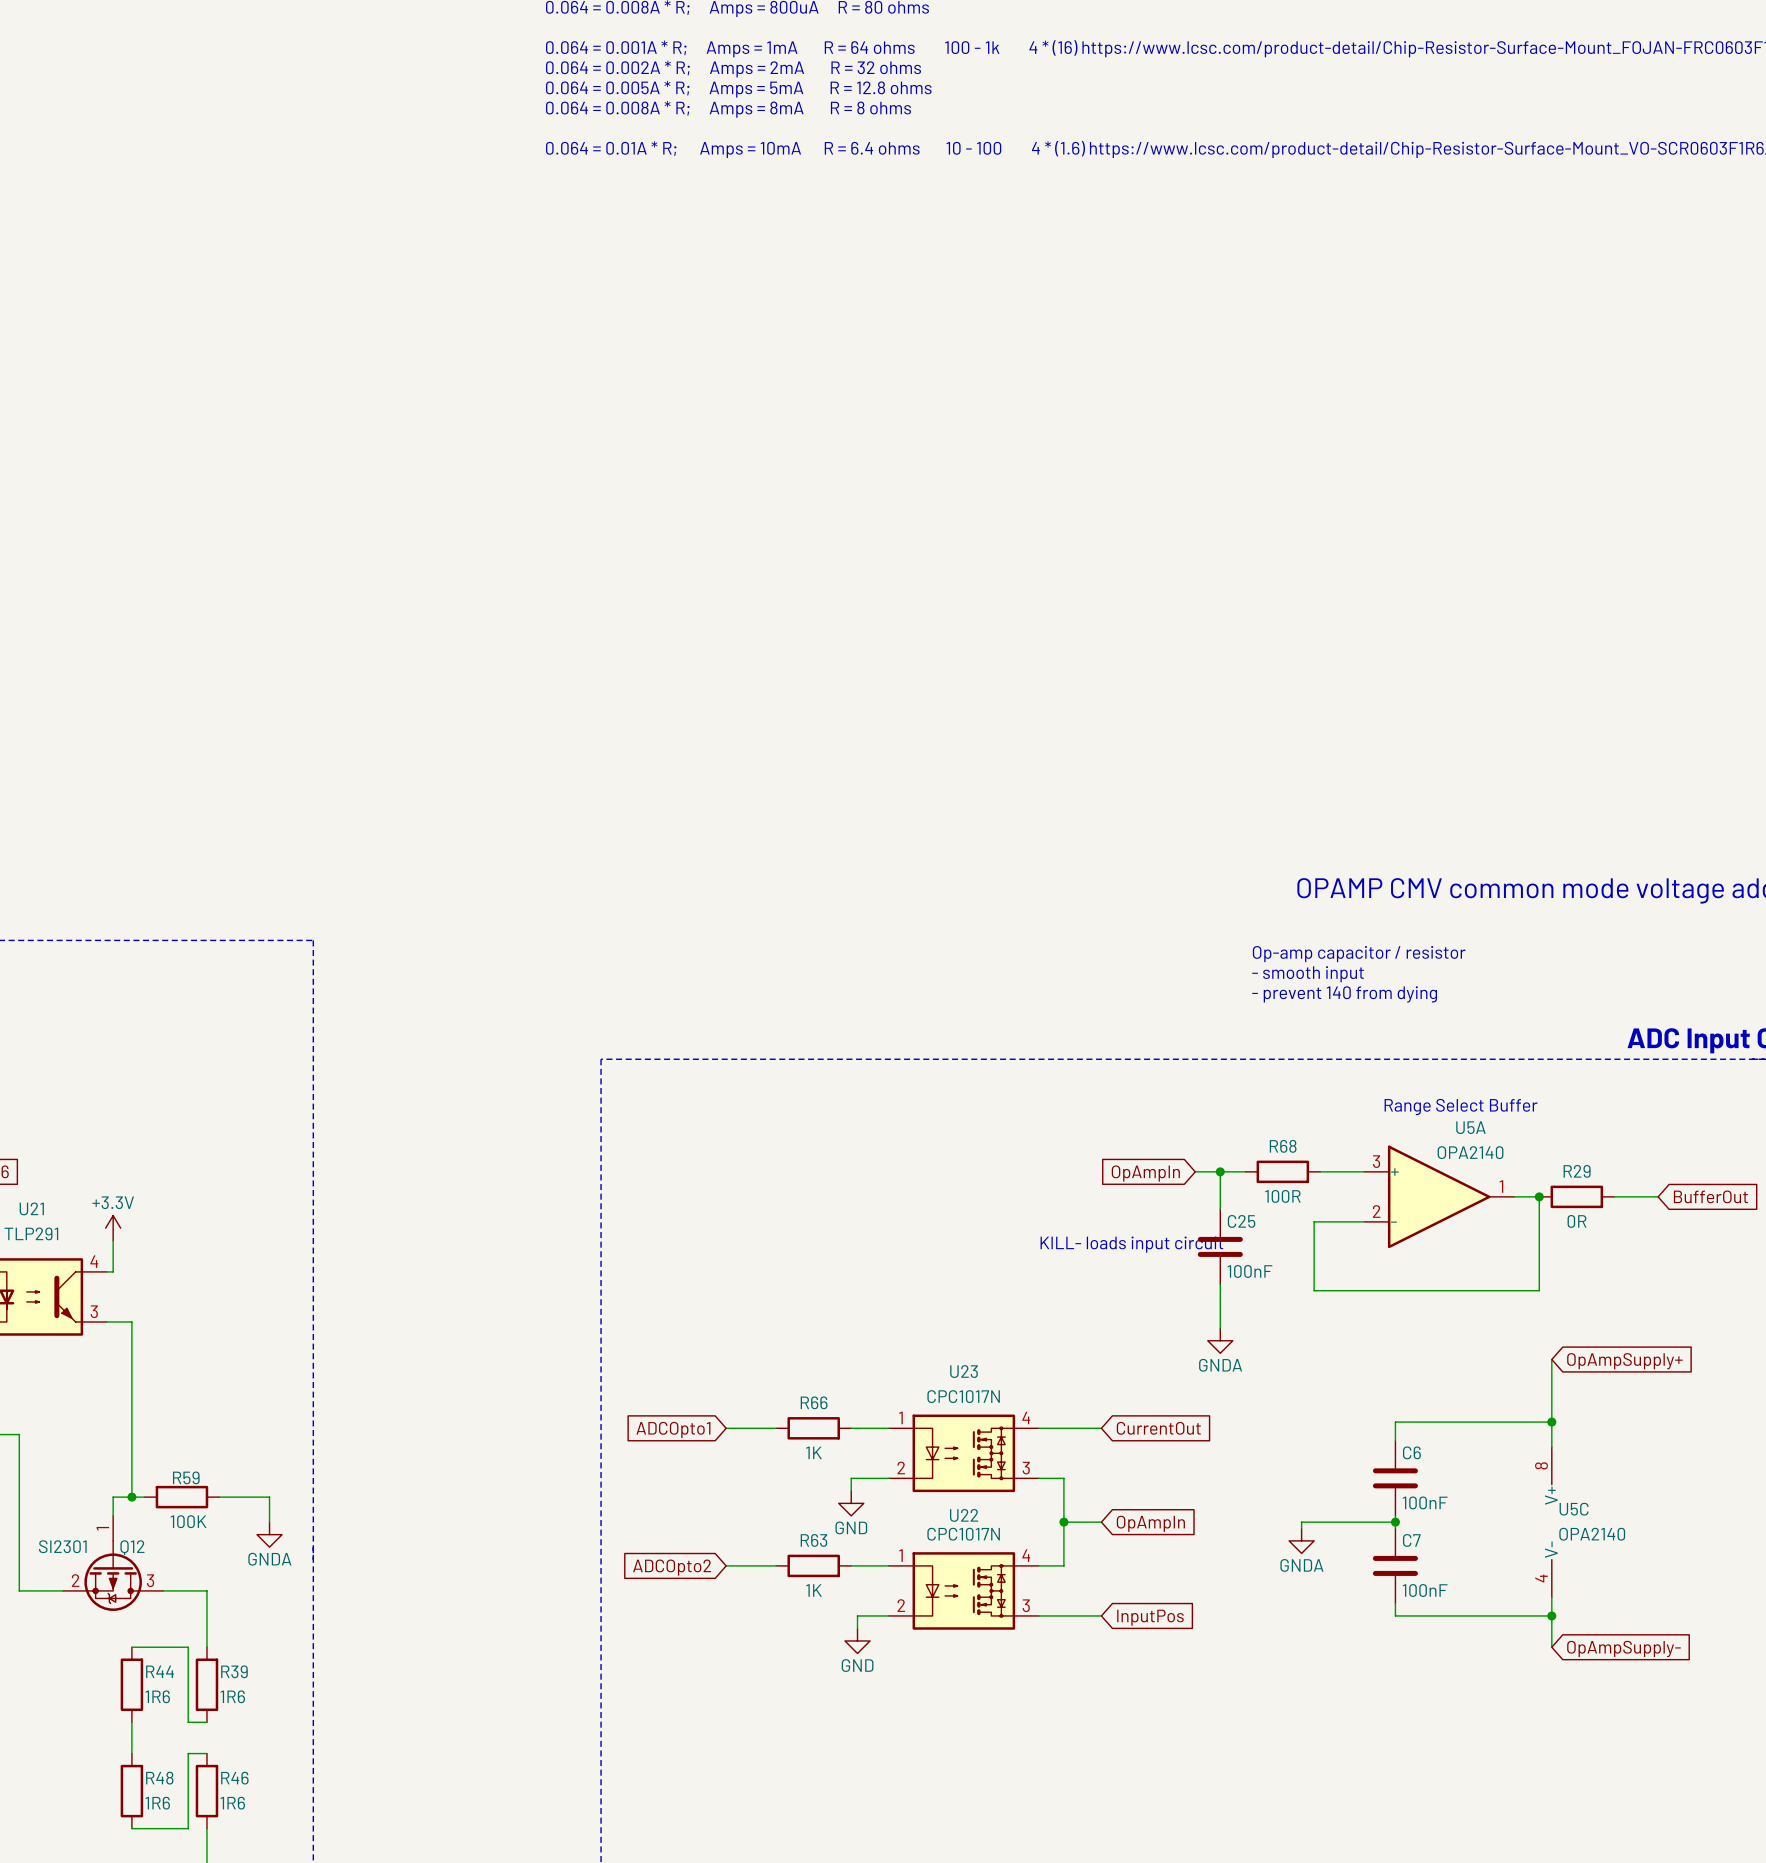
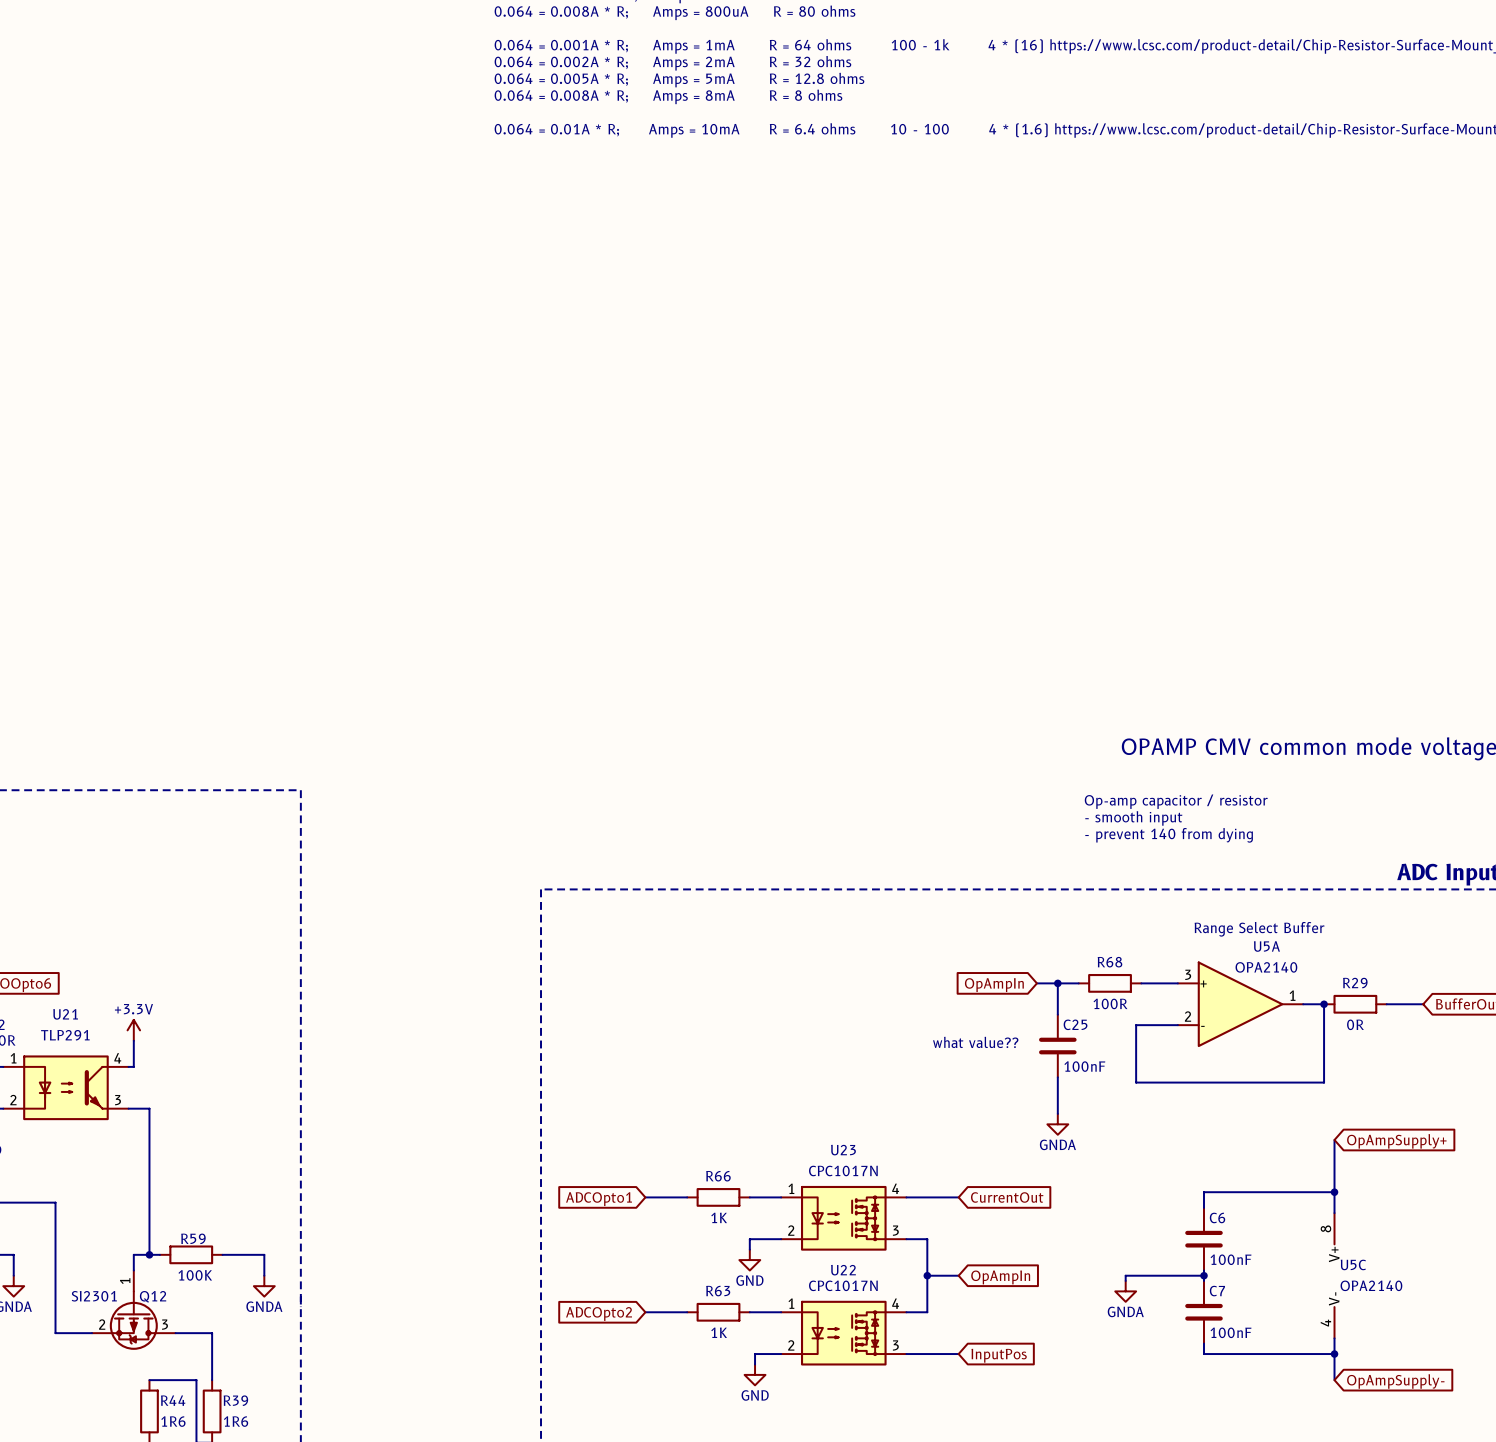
text: none -> what value?? (975, 1042)
text: KILL- loads input circuit (1131, 1244) -> none

